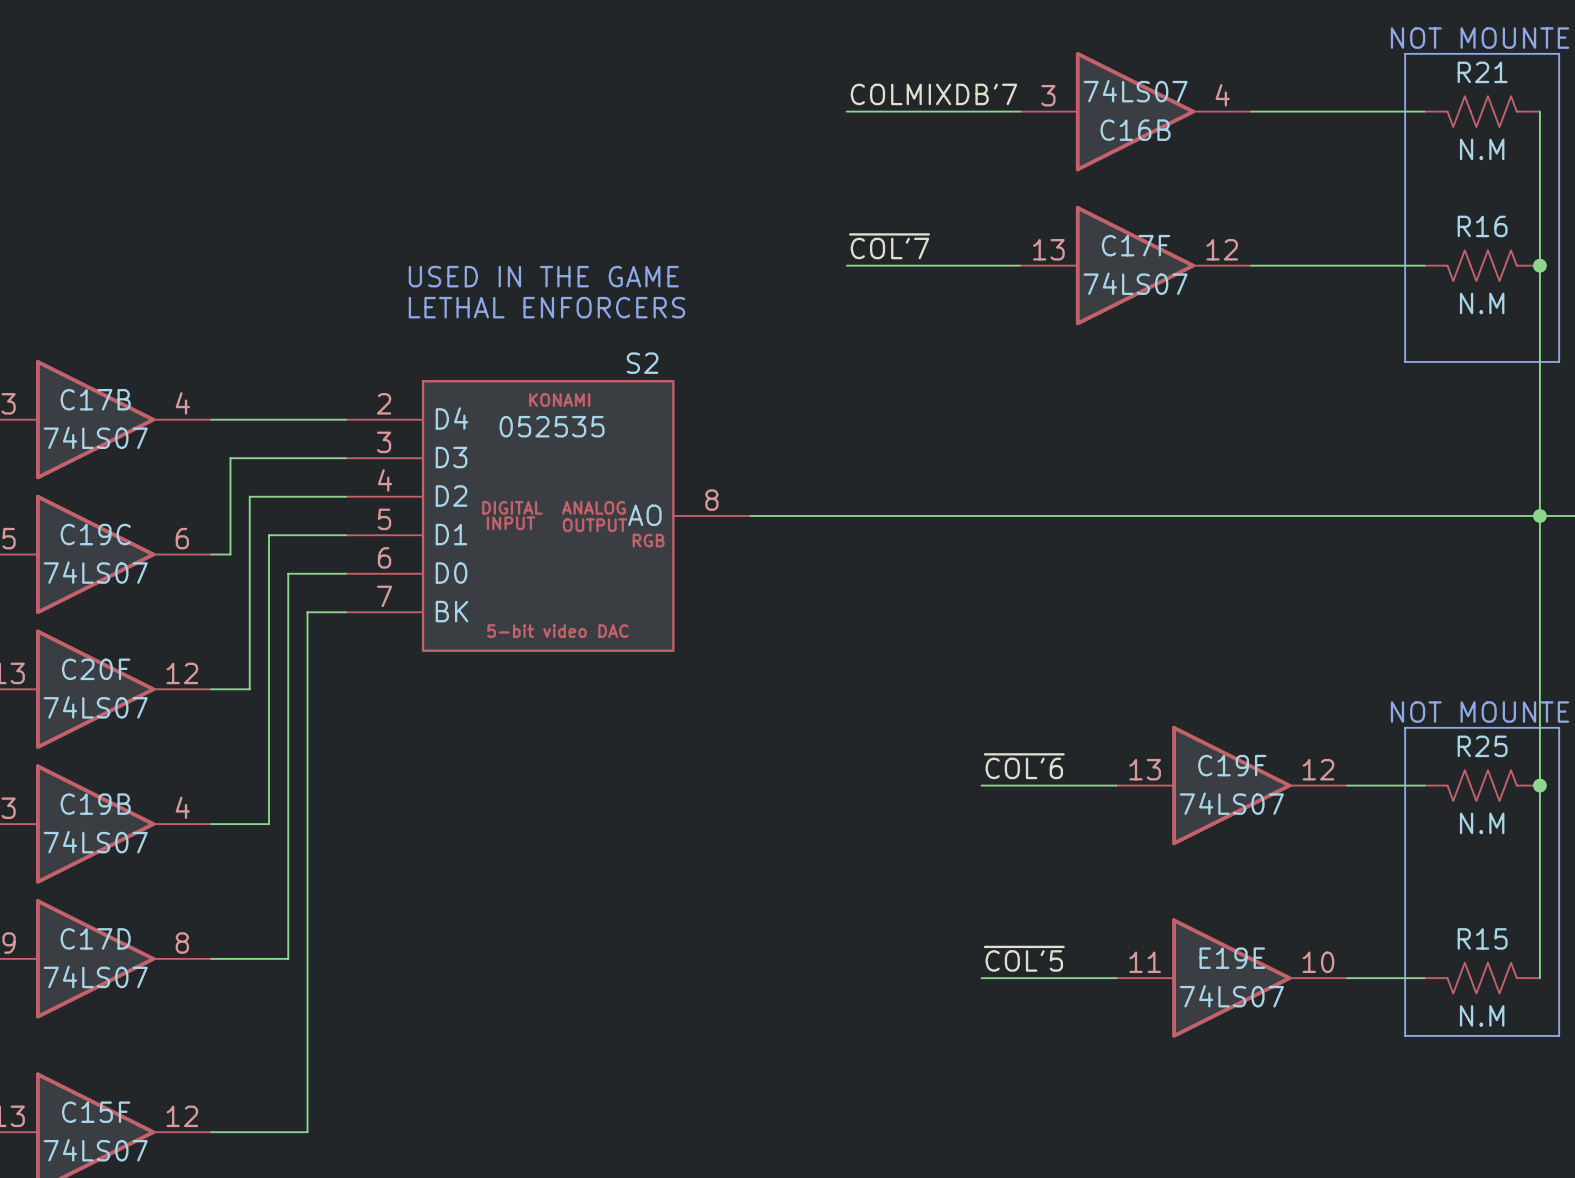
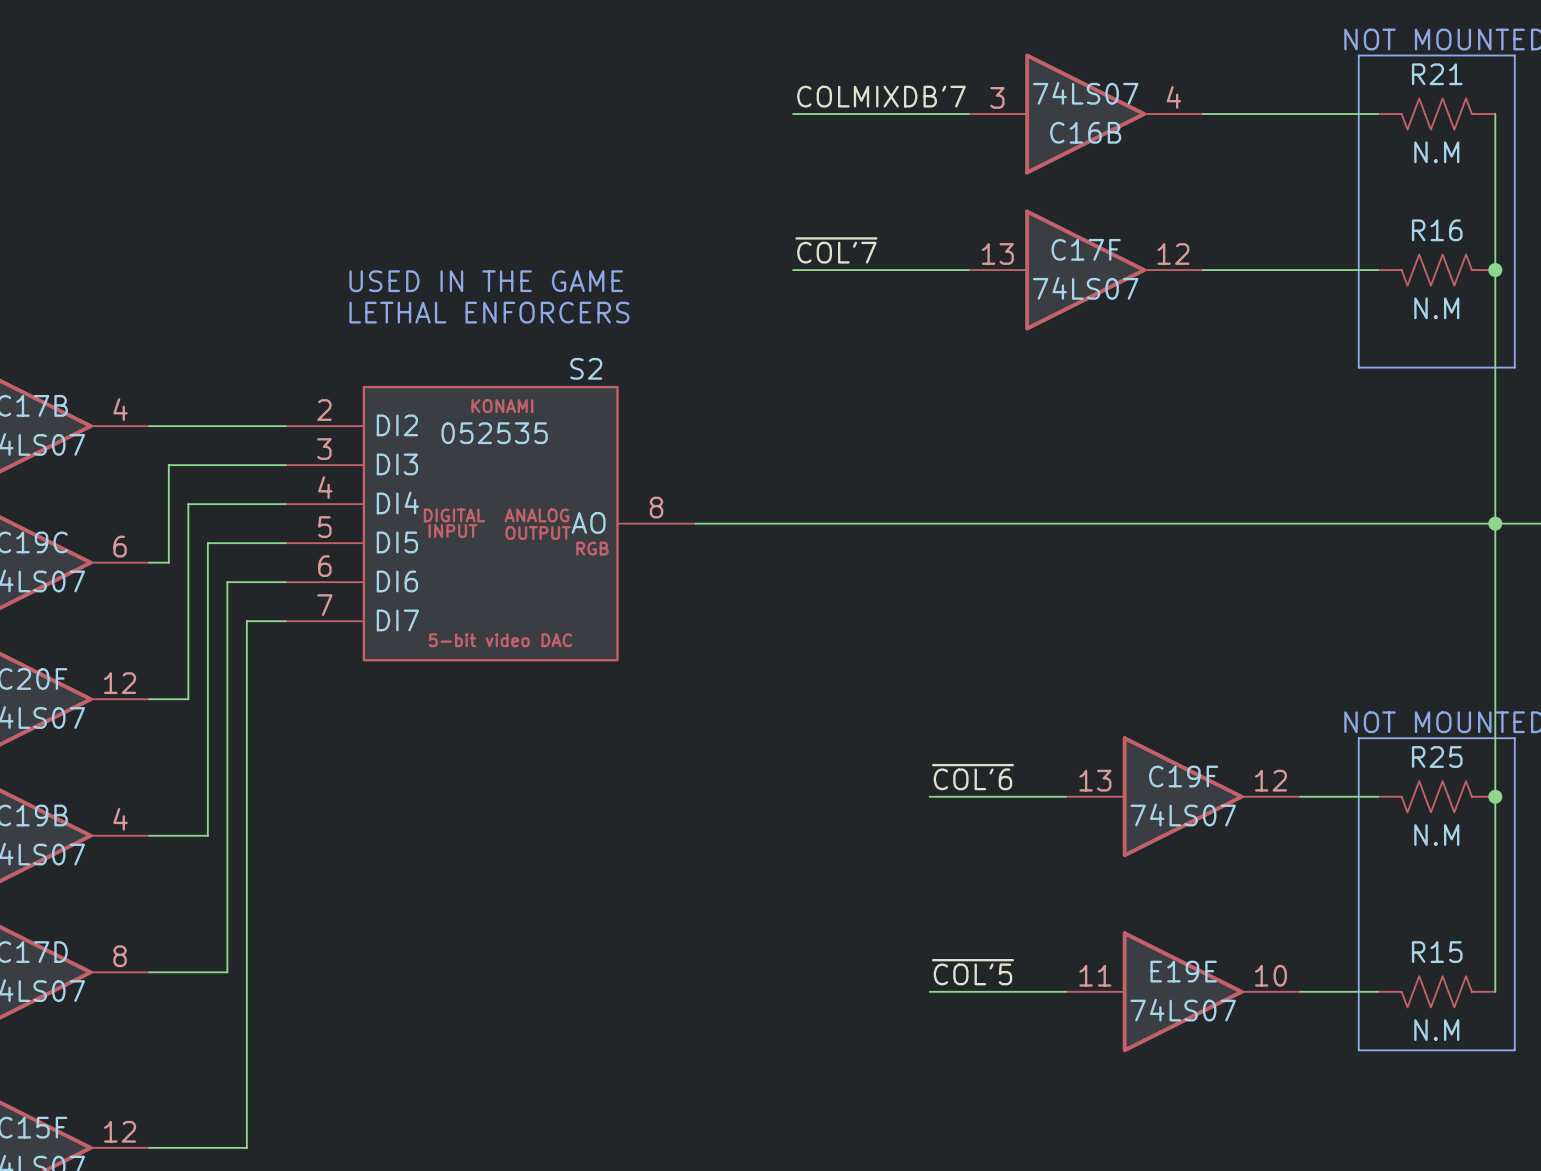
S2 pin name: D4 (451, 418) -> DI2 (397, 425)
S2 pin name: D3 (451, 457) -> DI3 (397, 464)
S2 pin name: D2 (451, 496) -> DI4 (397, 502)
S2 pin name: D1 (451, 534) -> DI5 (397, 542)
S2 pin name: D0 (451, 573) -> DI6 (397, 581)
S2 pin name: BK (451, 611) -> DI7 (397, 620)

